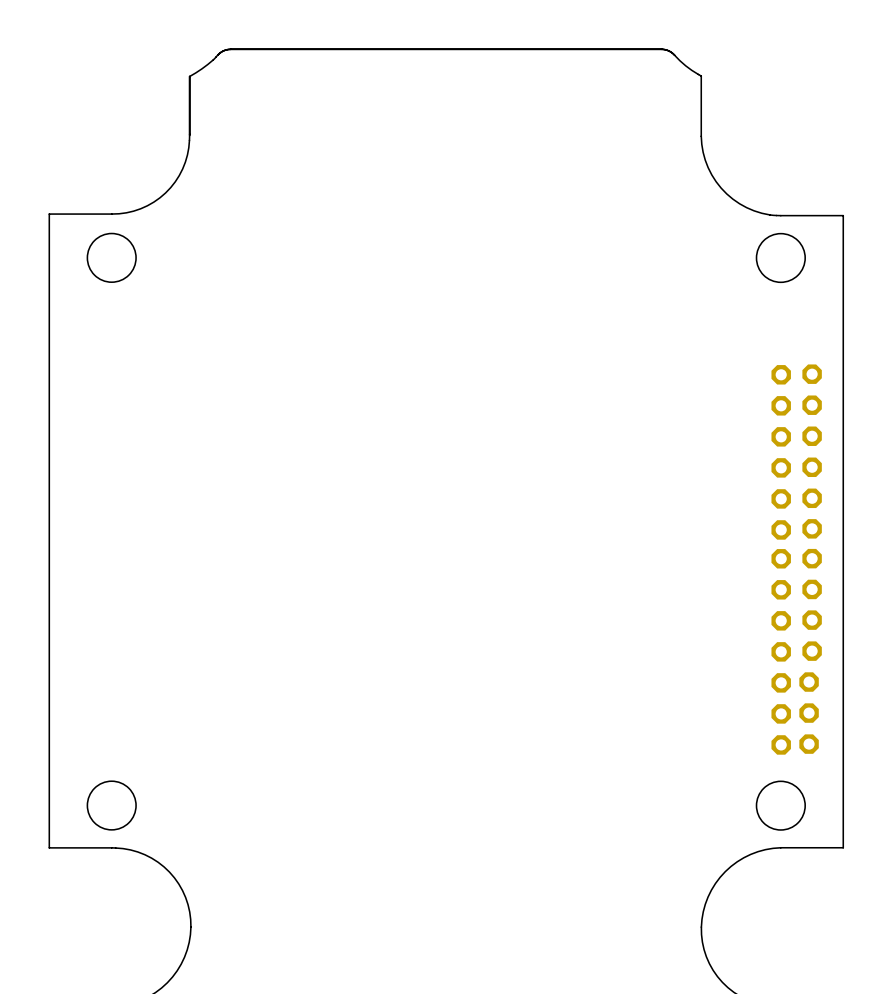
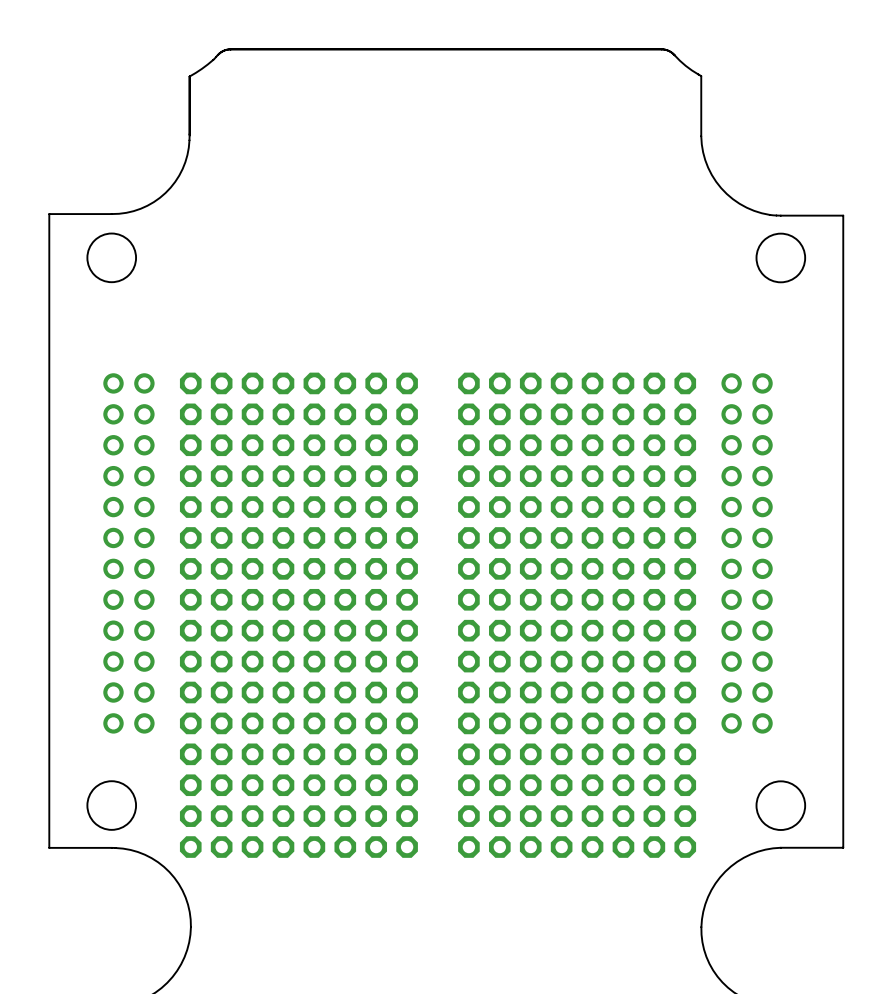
part: (781, 374) -> none
part: (812, 374) -> none
part: none -> (298, 383)
part: none -> (577, 383)
part: (781, 405) -> none
part: (812, 405) -> none
part: none -> (298, 414)
part: none -> (577, 414)
part: (781, 436) -> none
part: (812, 436) -> none
part: none -> (298, 445)
part: none -> (577, 445)
part: (781, 467) -> none
part: (812, 467) -> none
part: none -> (298, 476)
part: none -> (577, 476)
part: (781, 498) -> none
part: (812, 498) -> none
part: none -> (298, 507)
part: none -> (577, 507)
part: (812, 528) -> none
part: (781, 529) -> none
part: none -> (298, 537)
part: none -> (577, 537)
part: none -> (113, 553)
part: none -> (144, 553)
part: none -> (731, 553)
part: none -> (762, 553)
part: (781, 558) -> none
part: (812, 558) -> none
part: none -> (298, 568)
part: none -> (577, 568)
part: (781, 589) -> none
part: (812, 589) -> none
part: none -> (298, 599)
part: none -> (577, 599)
part: (781, 620) -> none
part: (812, 620) -> none
part: none -> (298, 630)
part: none -> (577, 630)
part: (781, 651) -> none
part: (812, 651) -> none
part: none -> (298, 661)
part: none -> (577, 661)
part: (781, 682) -> none
part: (809, 682) -> none
part: none -> (298, 692)
part: none -> (577, 692)
part: (781, 713) -> none
part: (809, 713) -> none
part: none -> (298, 723)
part: none -> (577, 723)
part: (781, 744) -> none
part: (809, 744) -> none
part: none -> (298, 754)
part: none -> (577, 754)
part: none -> (298, 785)
part: none -> (577, 785)
part: none -> (298, 816)
part: none -> (577, 816)
part: none -> (298, 847)
part: none -> (577, 847)

